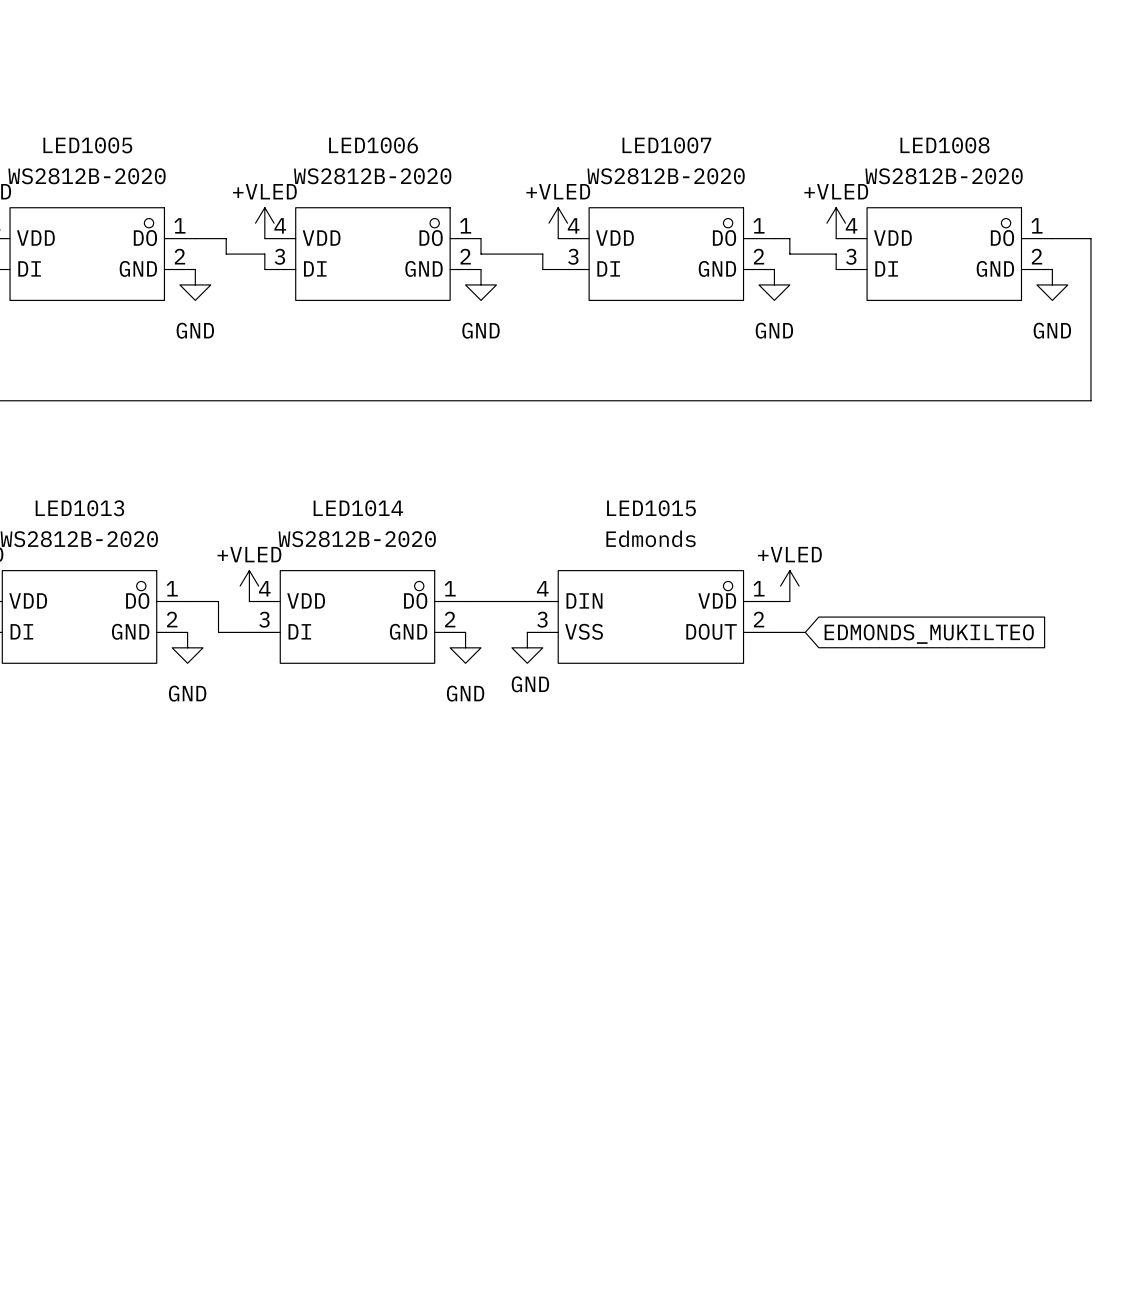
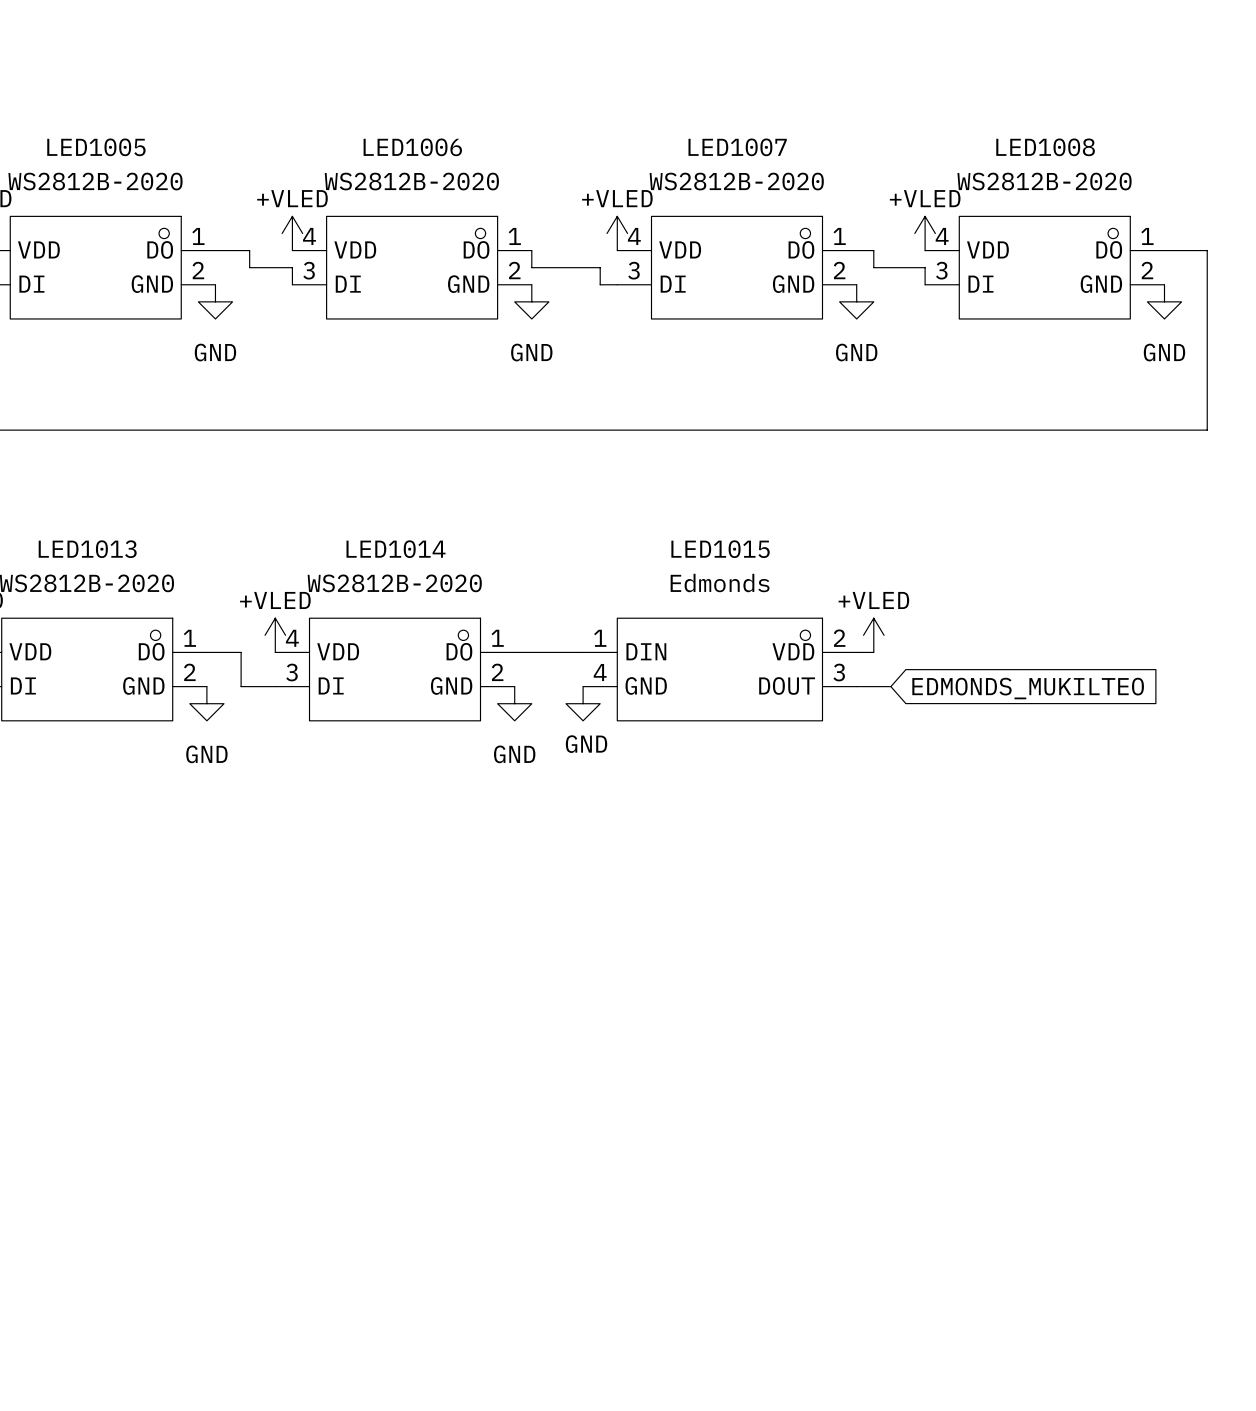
LED1015 pin number: 4 (542, 588) -> 1 (600, 638)
LED1015 pin number: 1 (759, 588) -> 2 (839, 638)
LED1015 pin number: 3 (542, 619) -> 4 (600, 672)
LED1015 pin number: 2 (758, 619) -> 3 (839, 672)
LED1015 pin name: VSS (584, 631) -> GND (646, 685)

